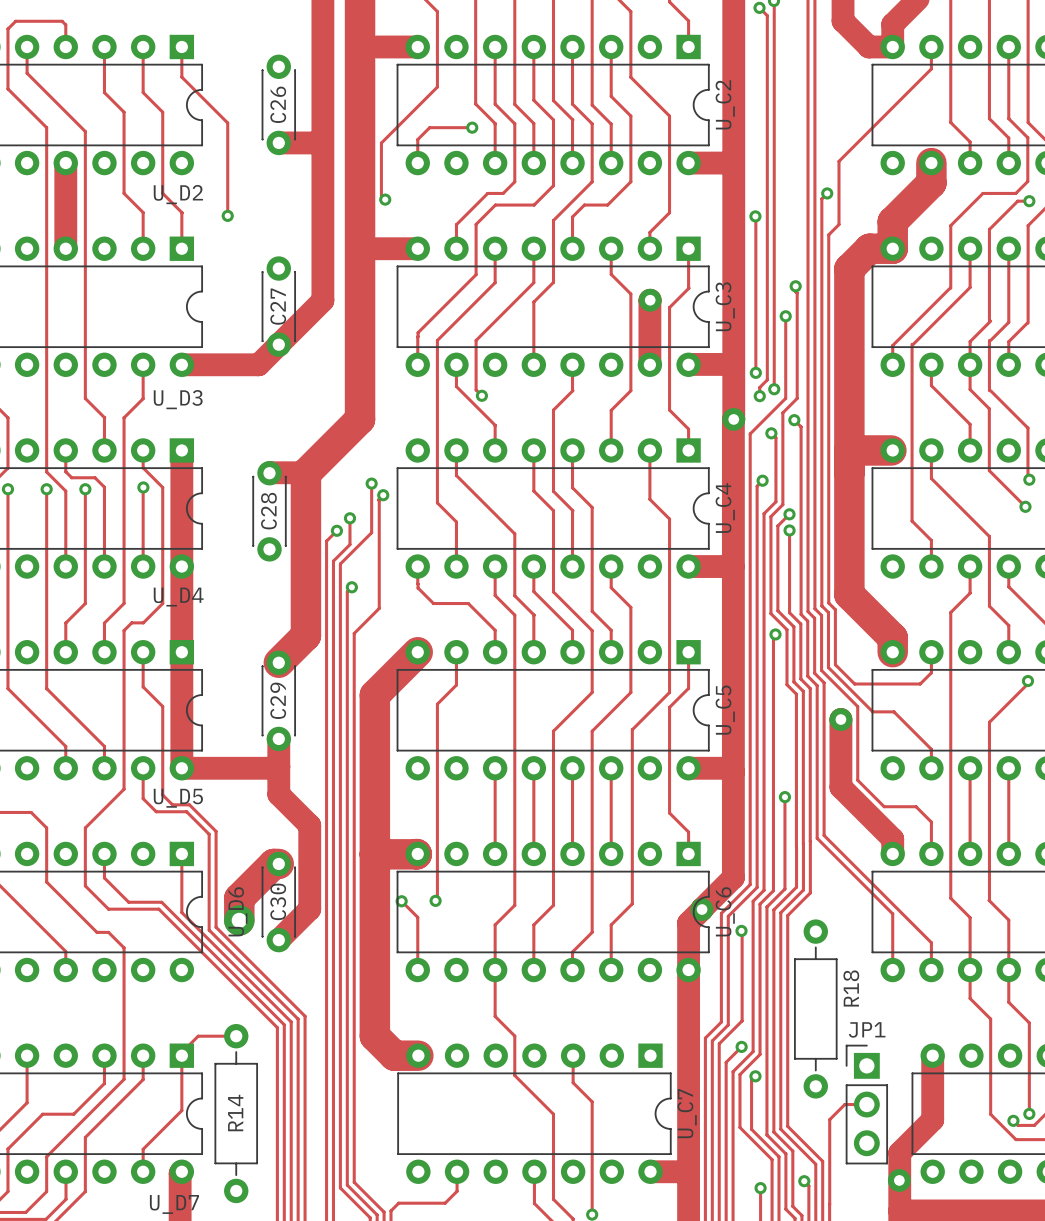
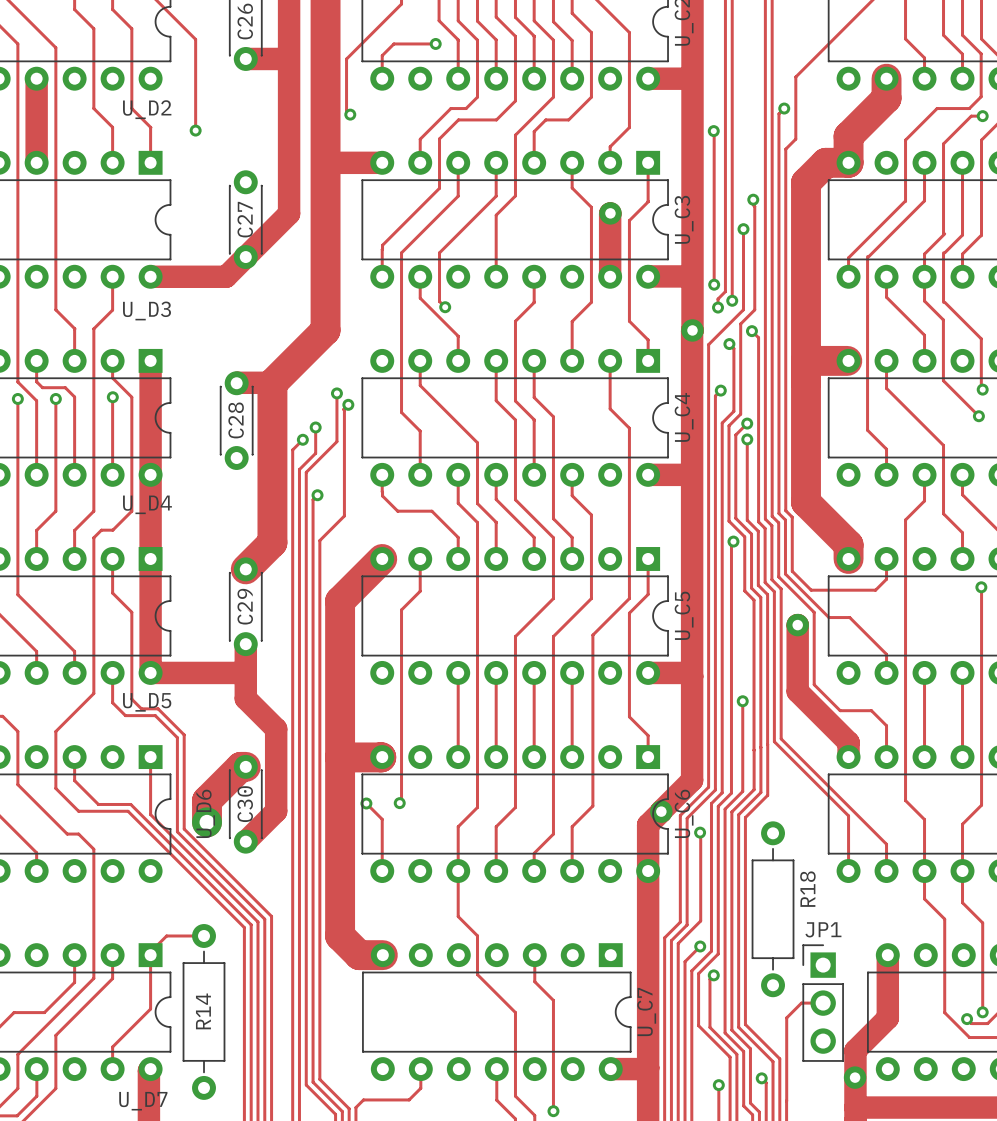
track: (1027, 681) (1027, 683) (989, 722) (989, 900) (1008, 920) (1008, 922) -> (981, 589) (981, 805) (962, 824)

